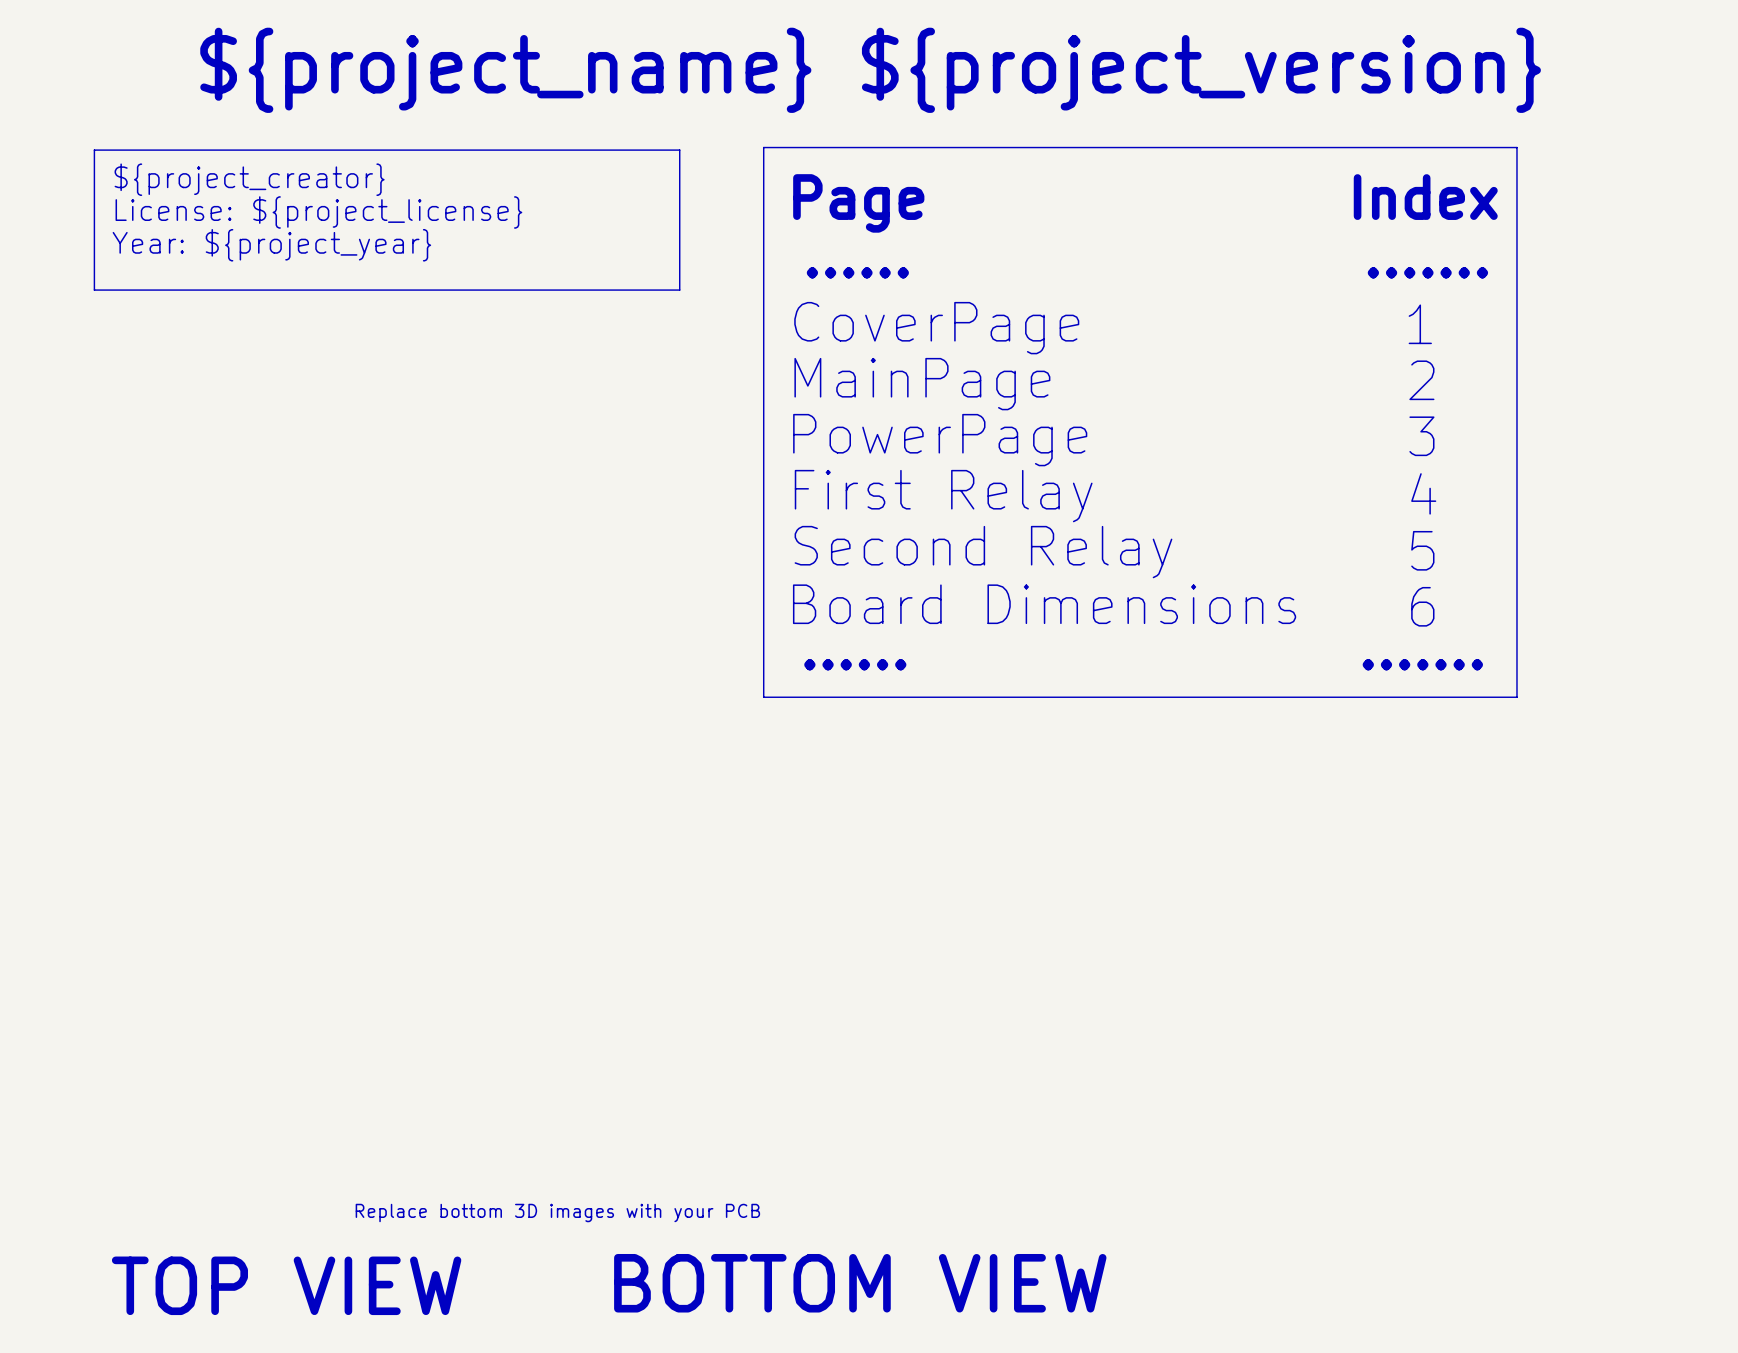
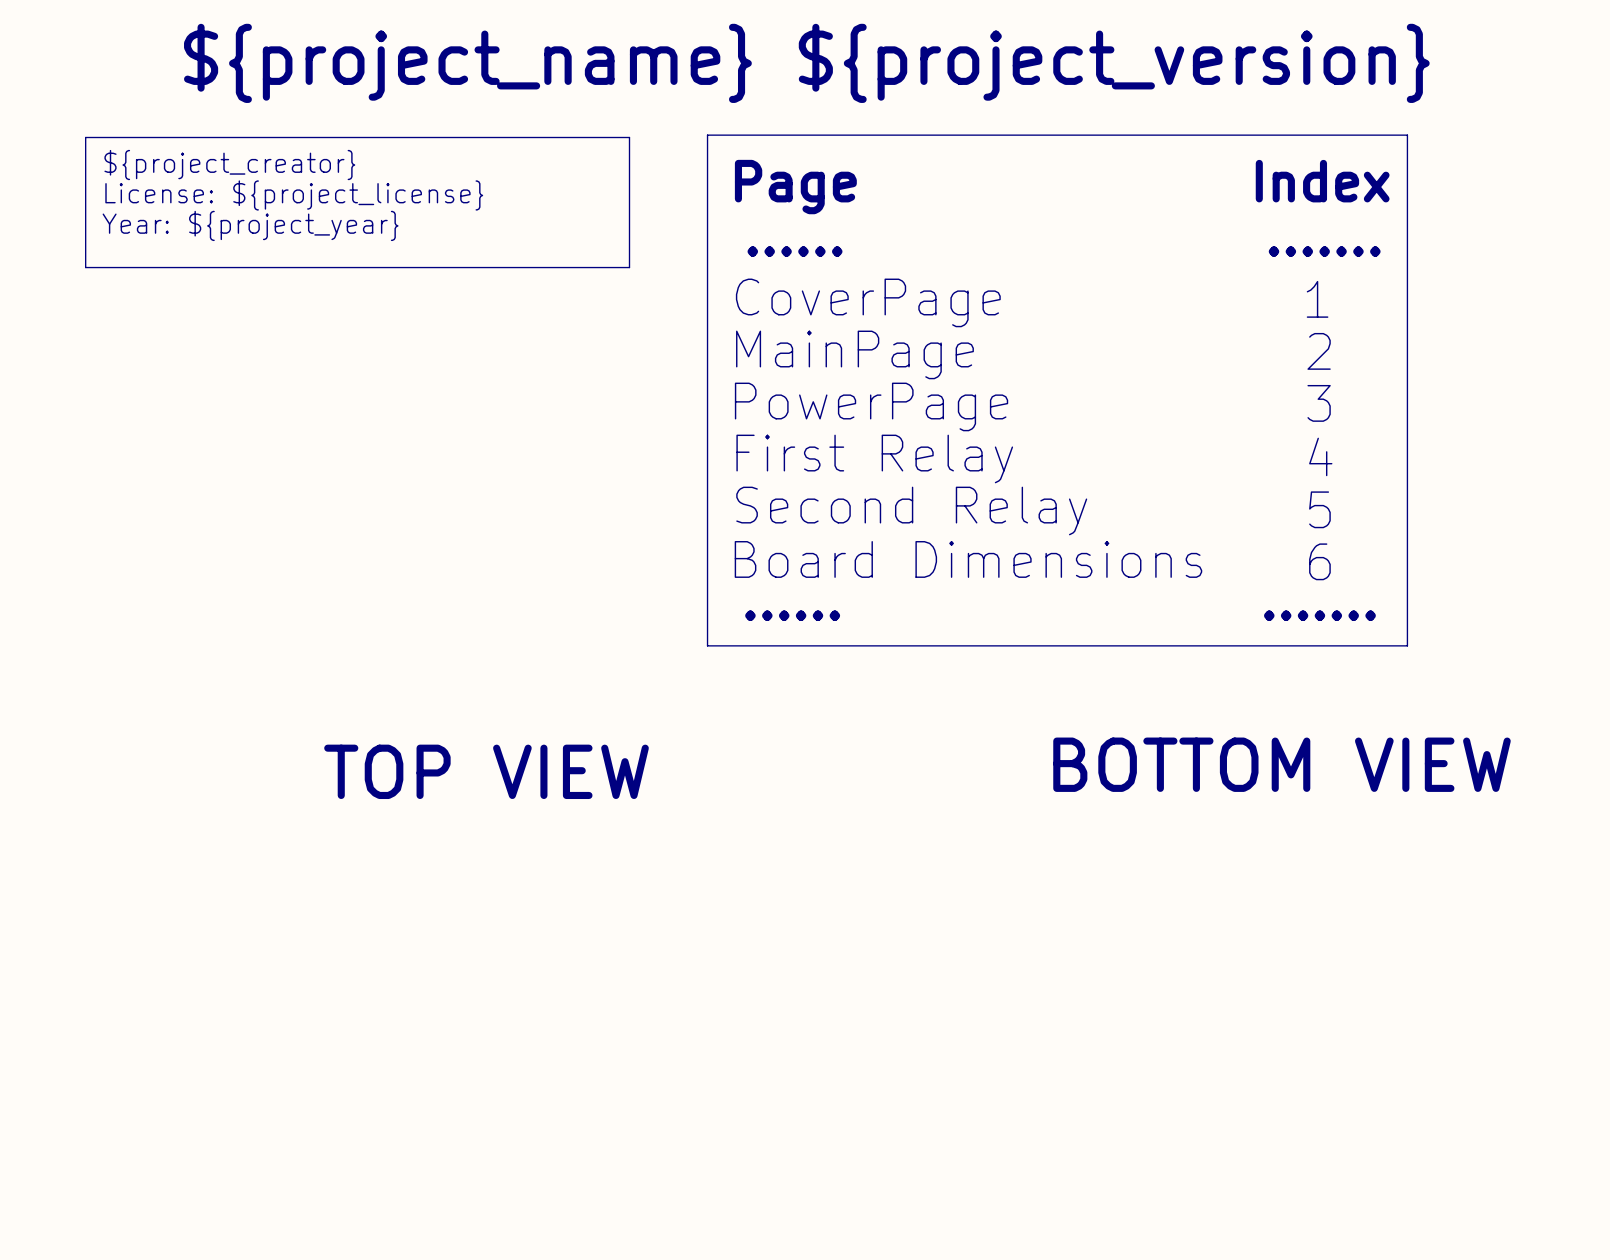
text: none -> BOTTOM VIEW (1281, 764)
text: none -> TOP VIEW (486, 771)
text: Replace bottom 3D images with your PCB (557, 1212) -> none
text: BOTTOM VIEW (860, 1283) -> none
text: TOP VIEW (286, 1285) -> none

